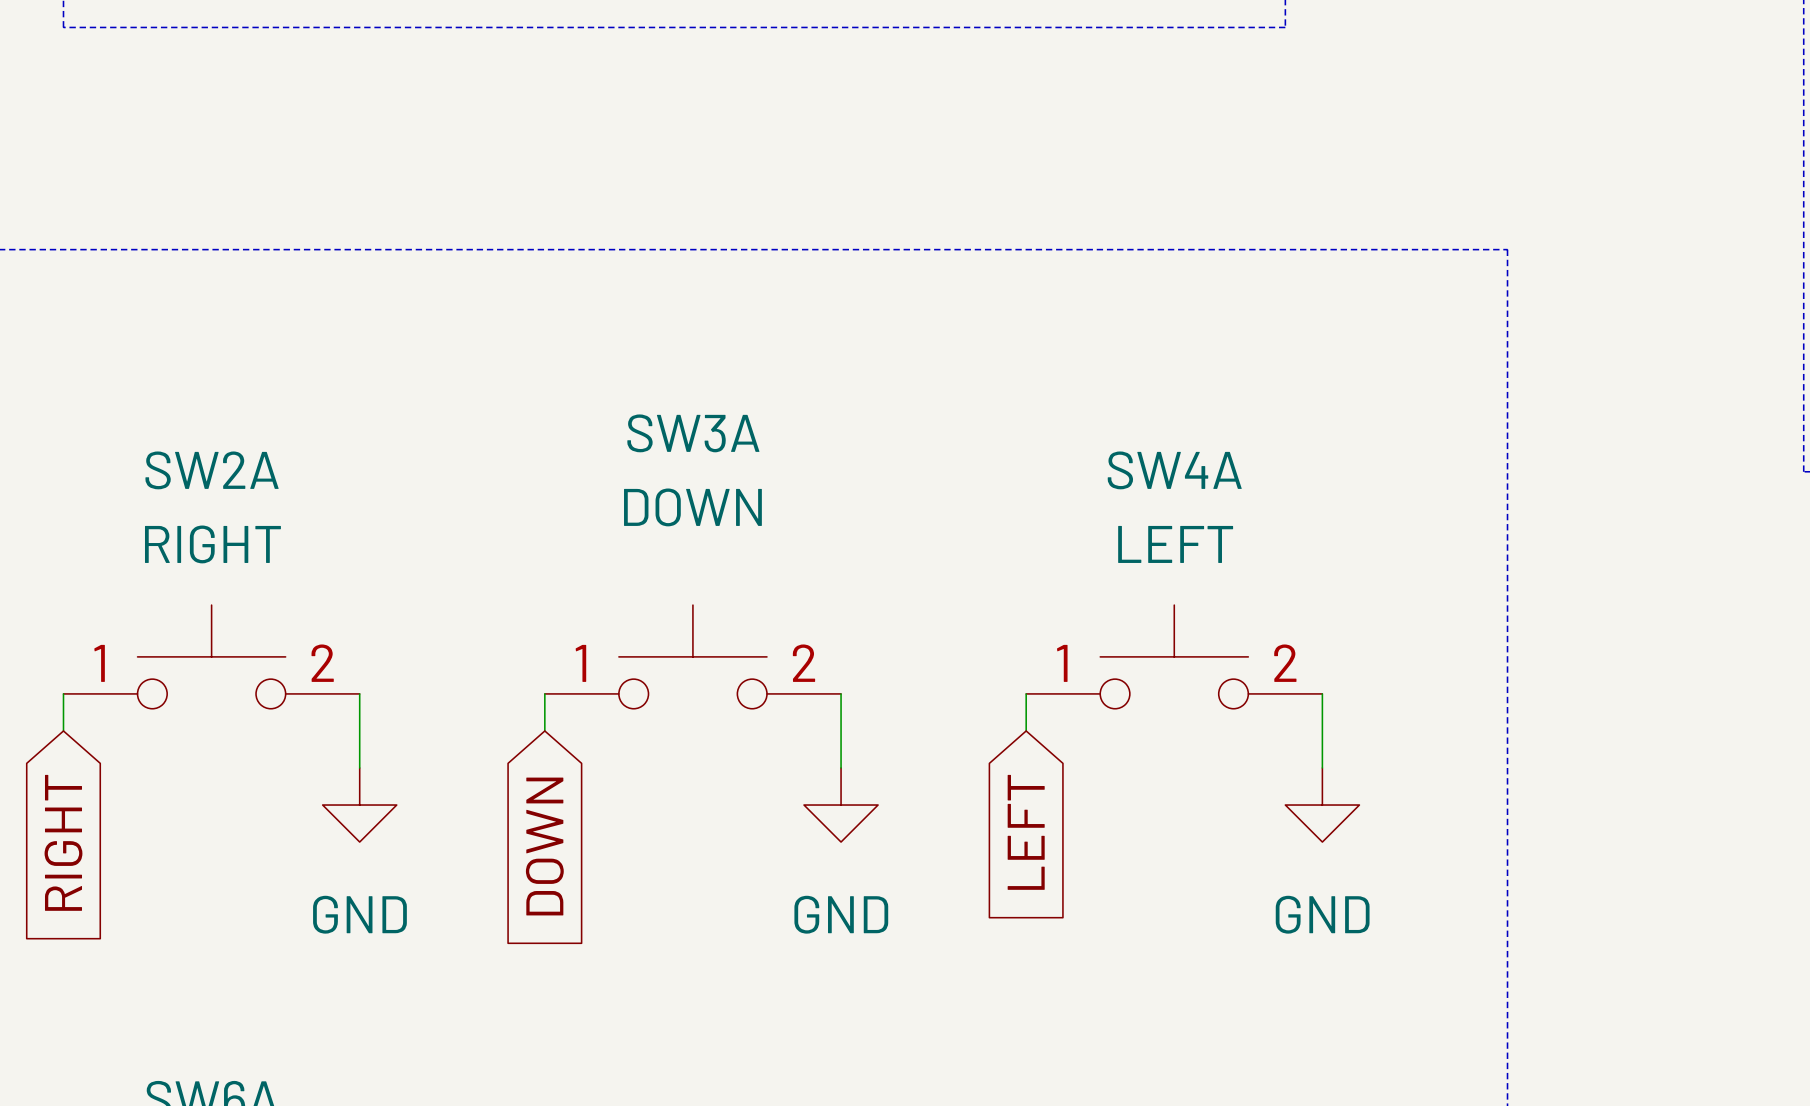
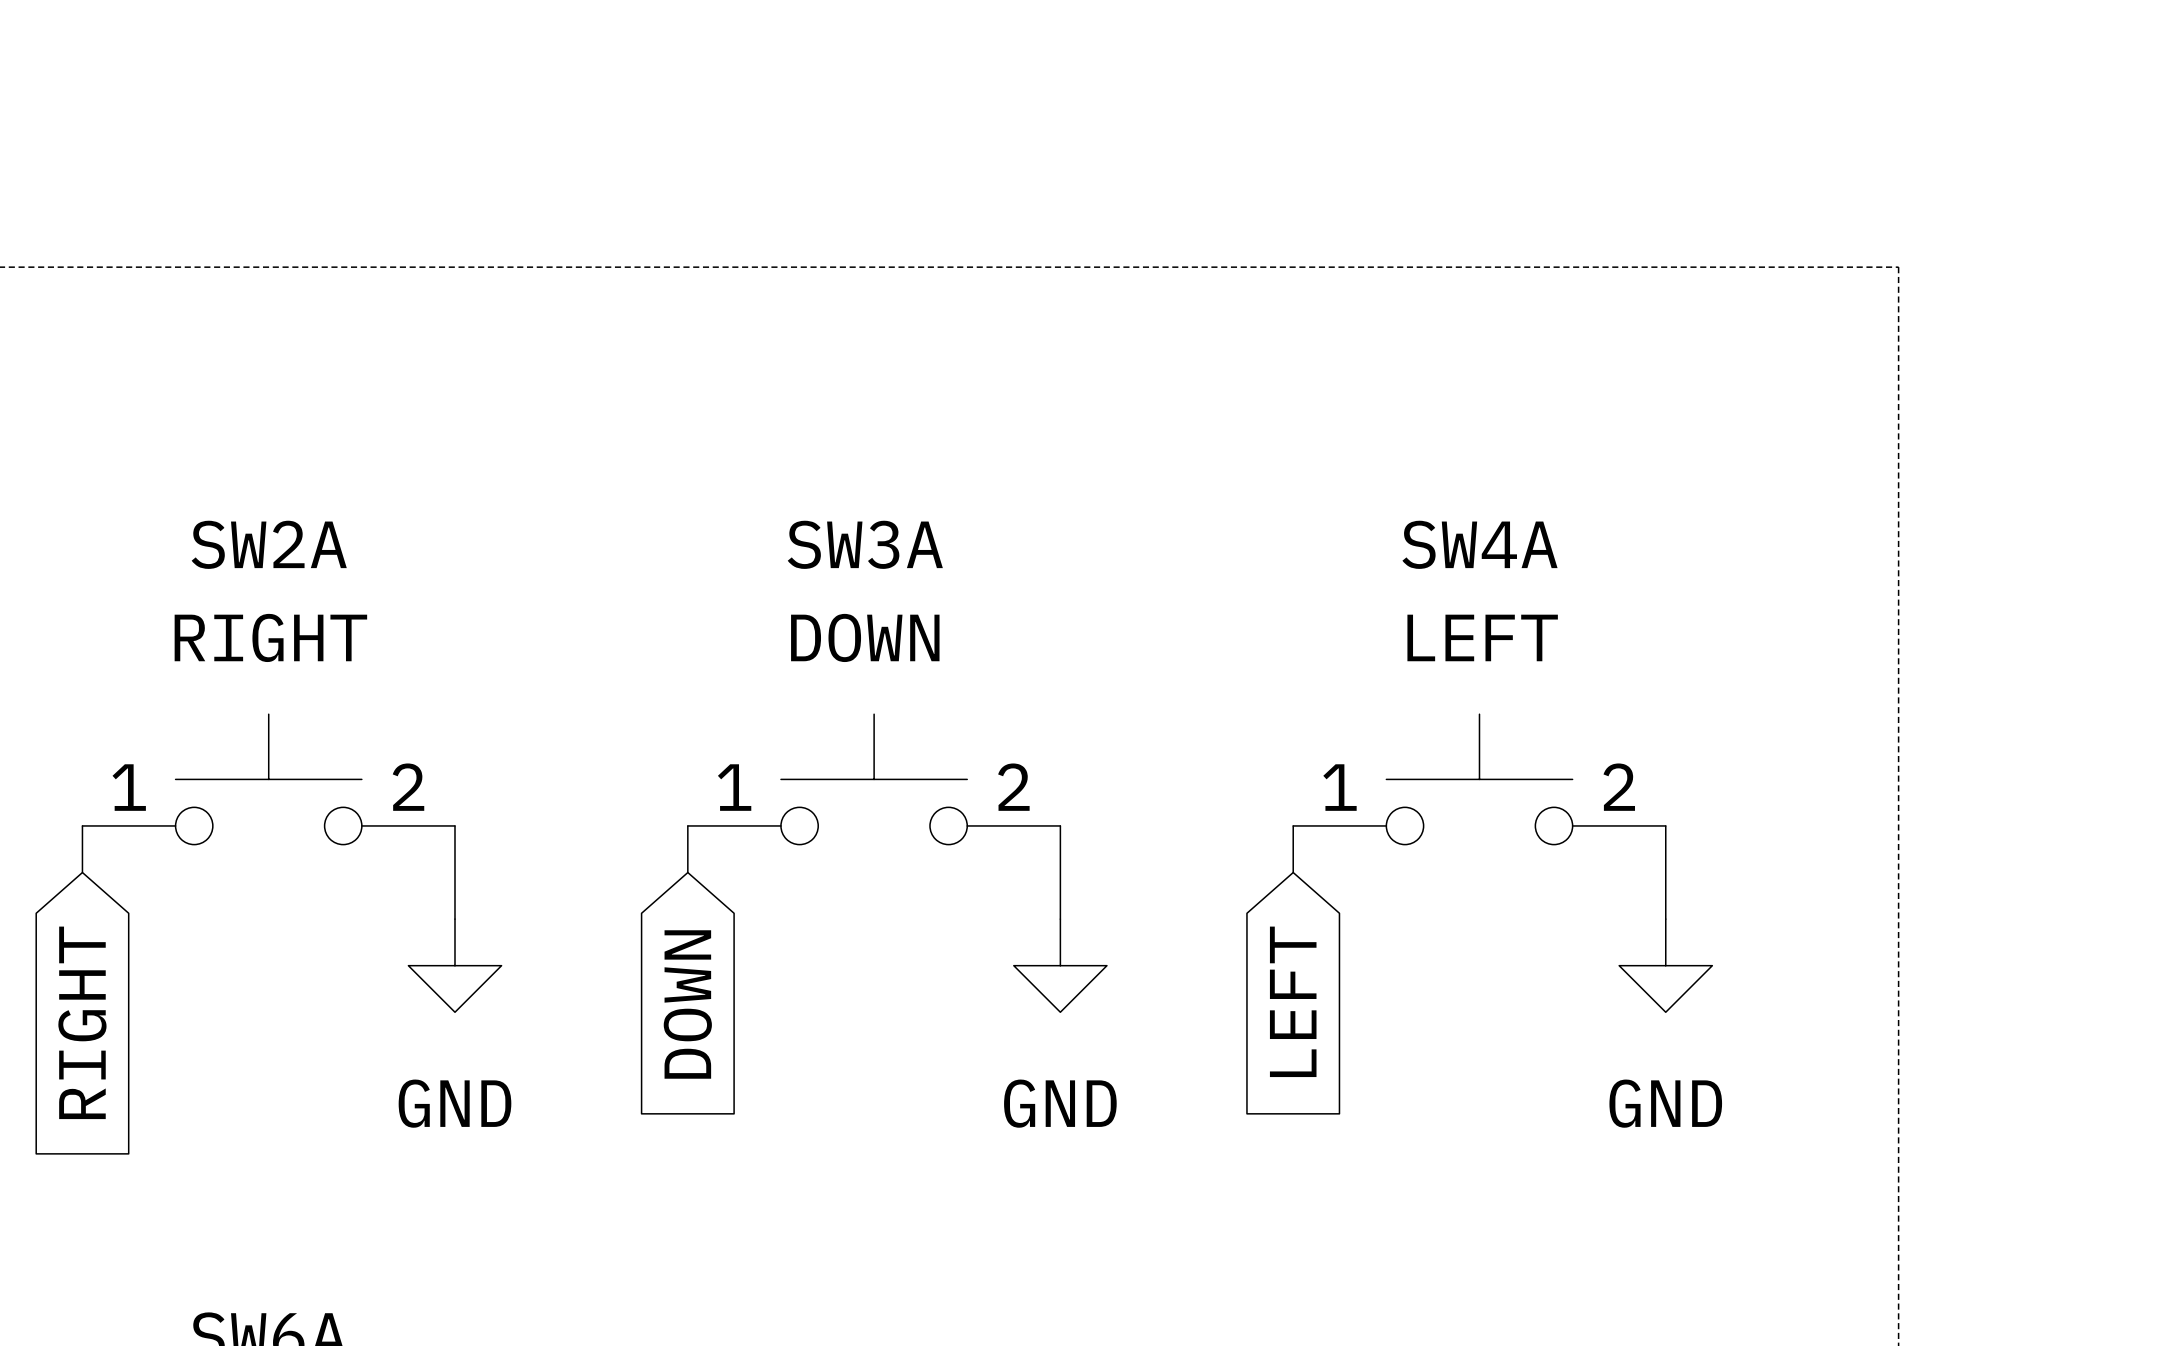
SW3A name position: SW3A (693, 433) -> SW3A (865, 544)
SW3A value position: DOWN (692, 507) -> DOWN (865, 637)

